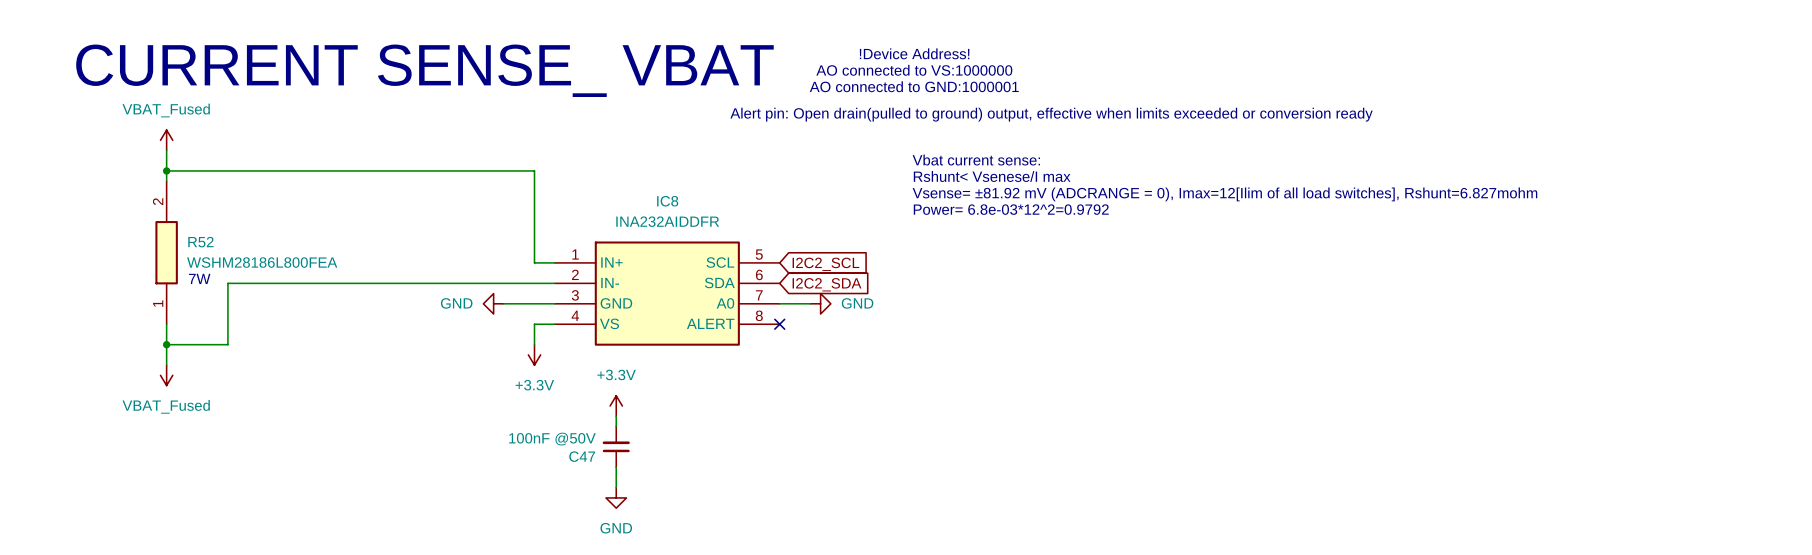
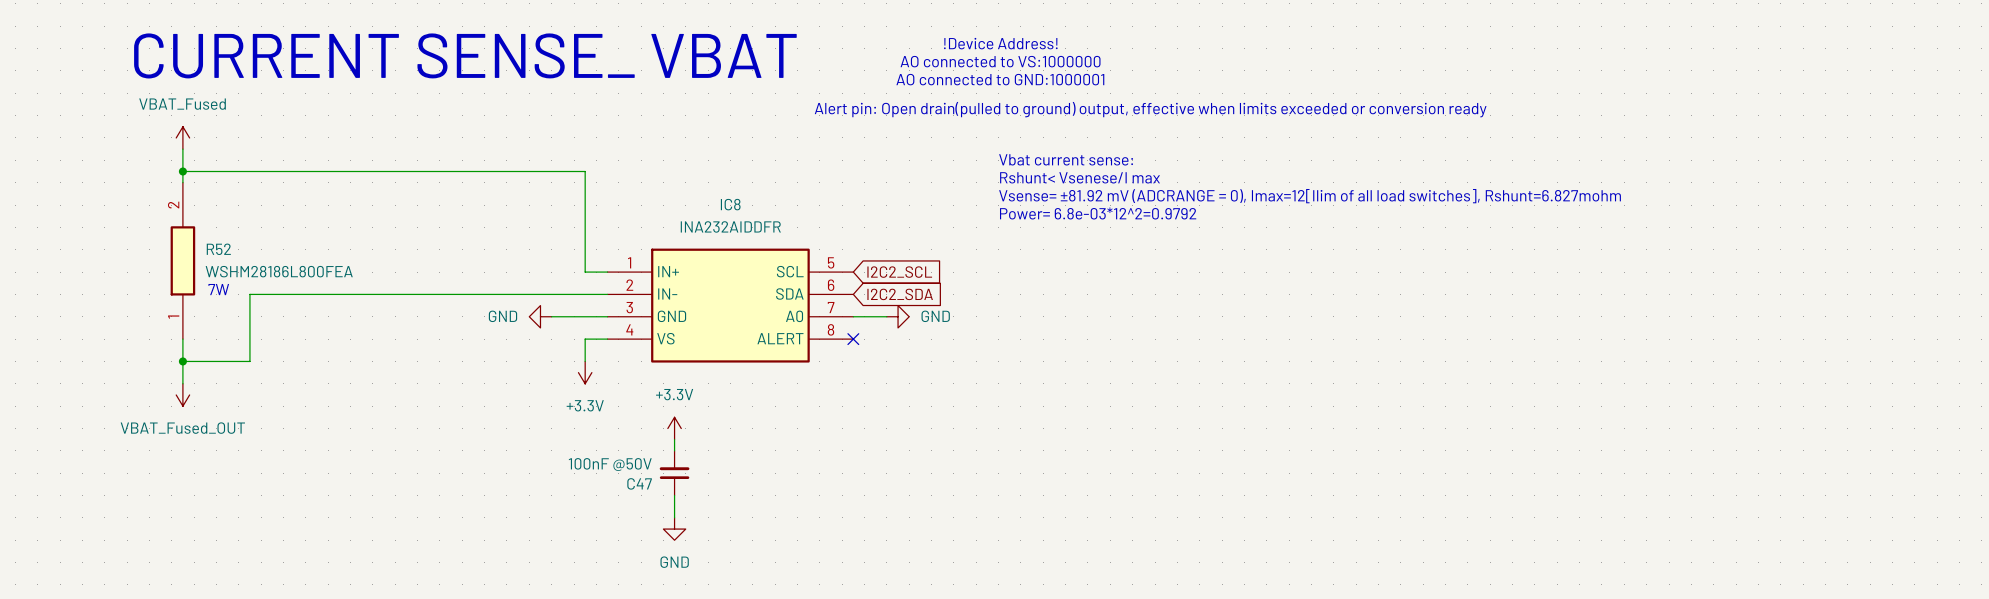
power symbol: VBAT_Fused (166, 375) -> VBAT_Fused_OUT (182, 394)

